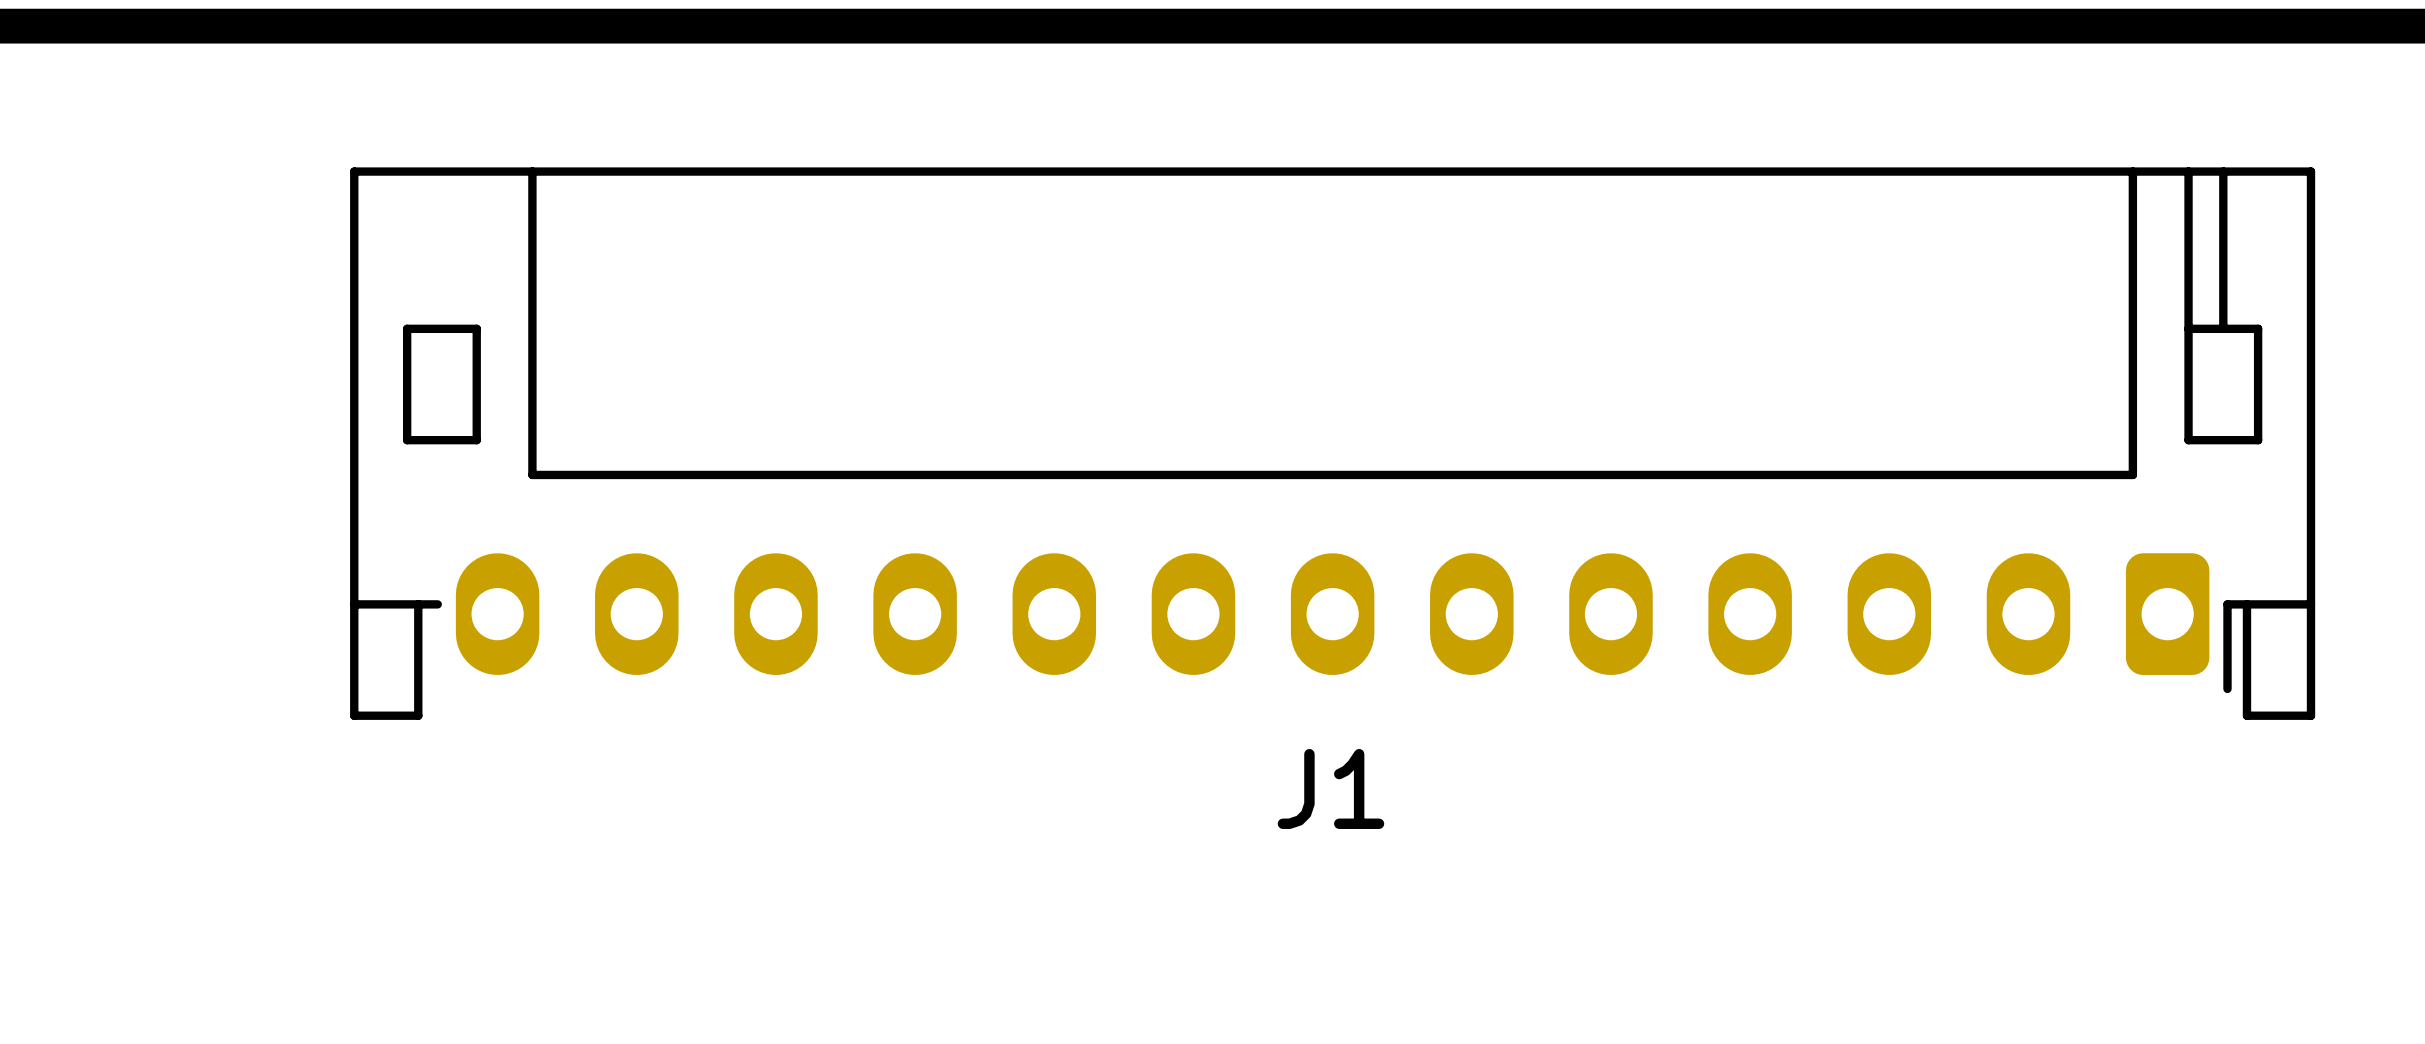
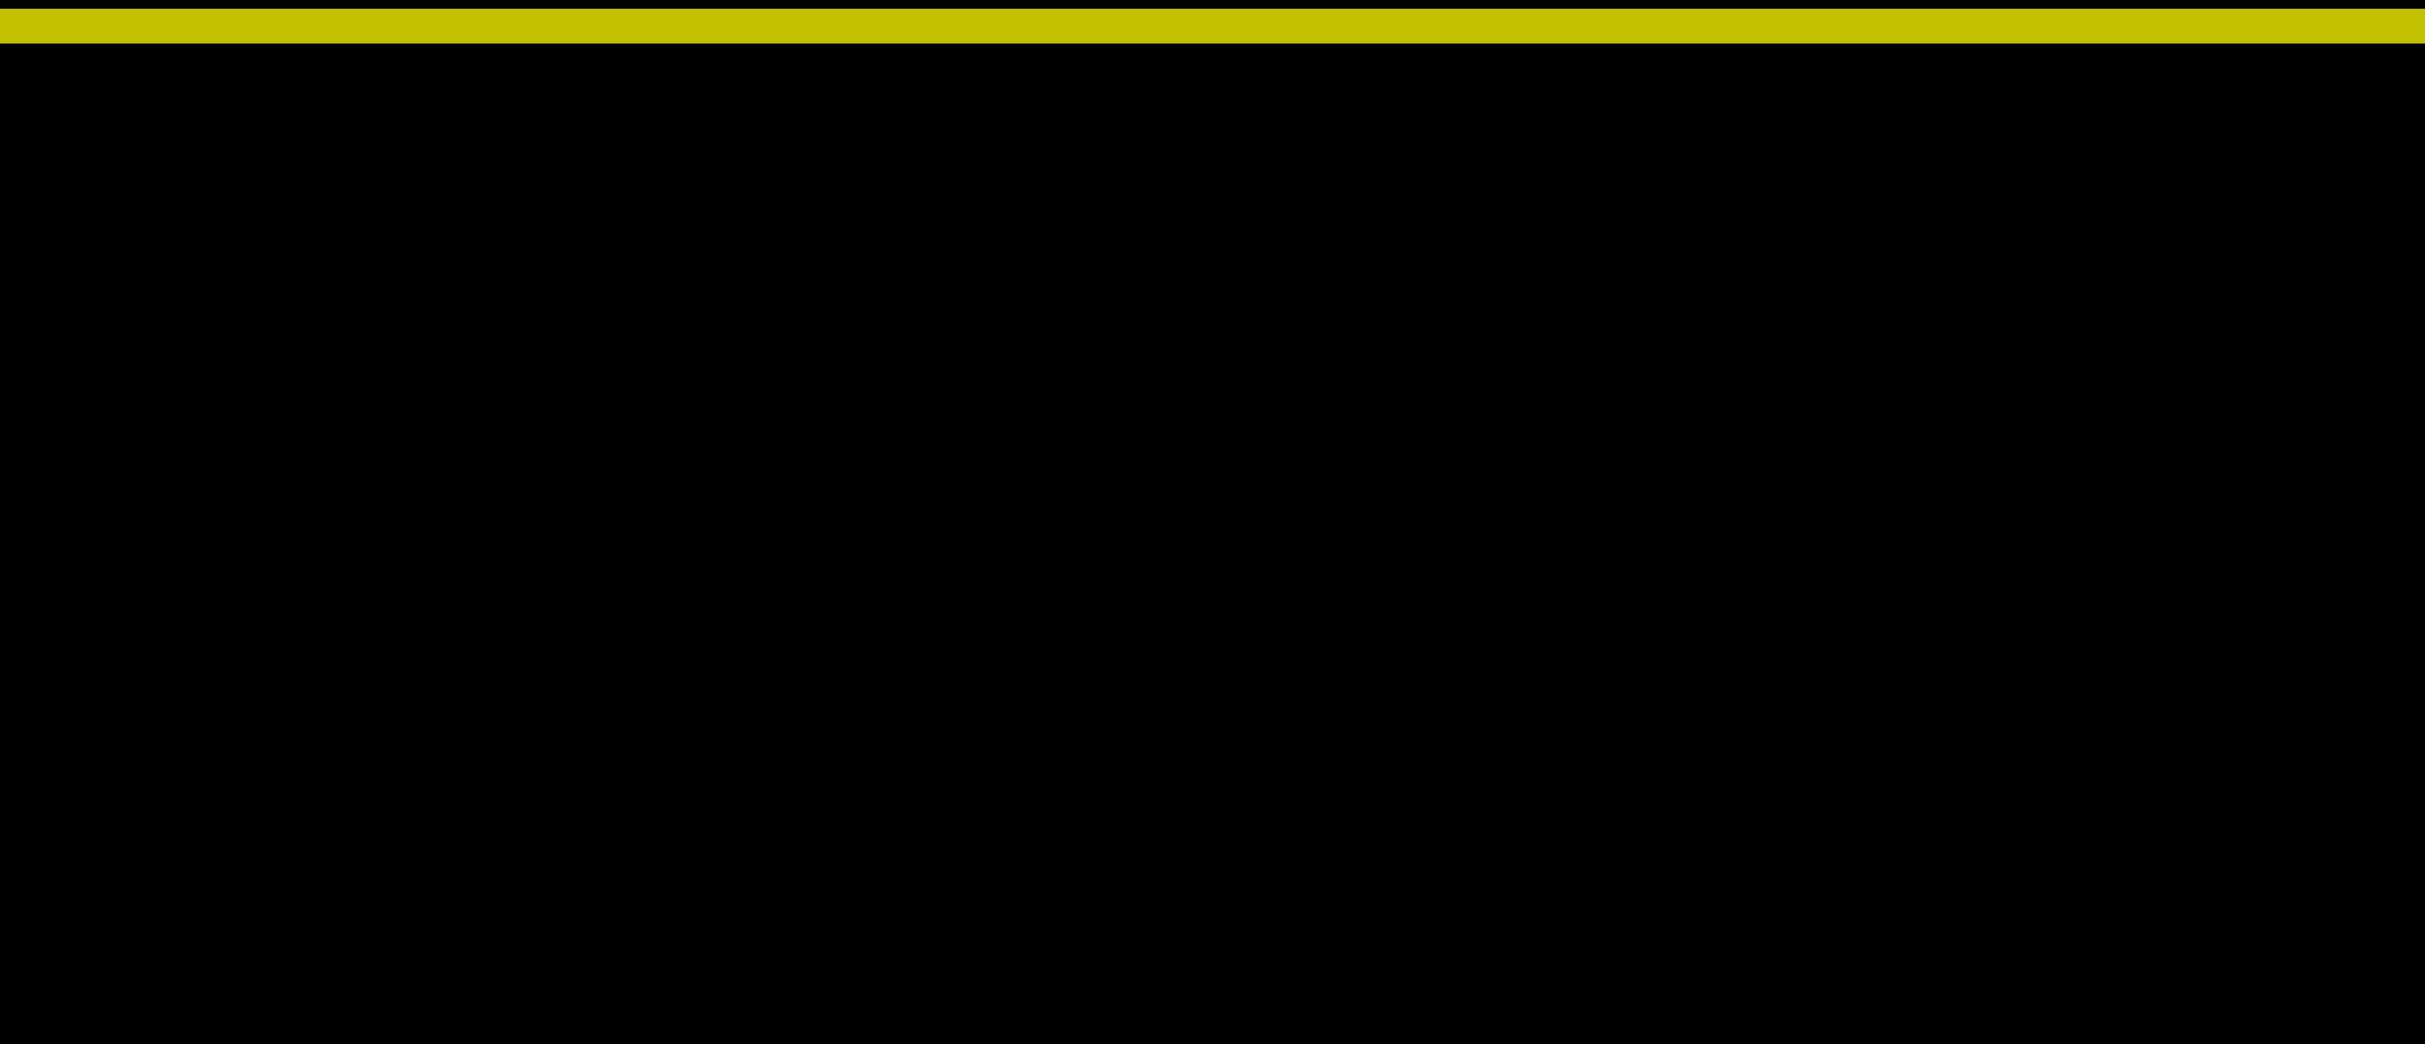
J1: (1332, 443) -> none

